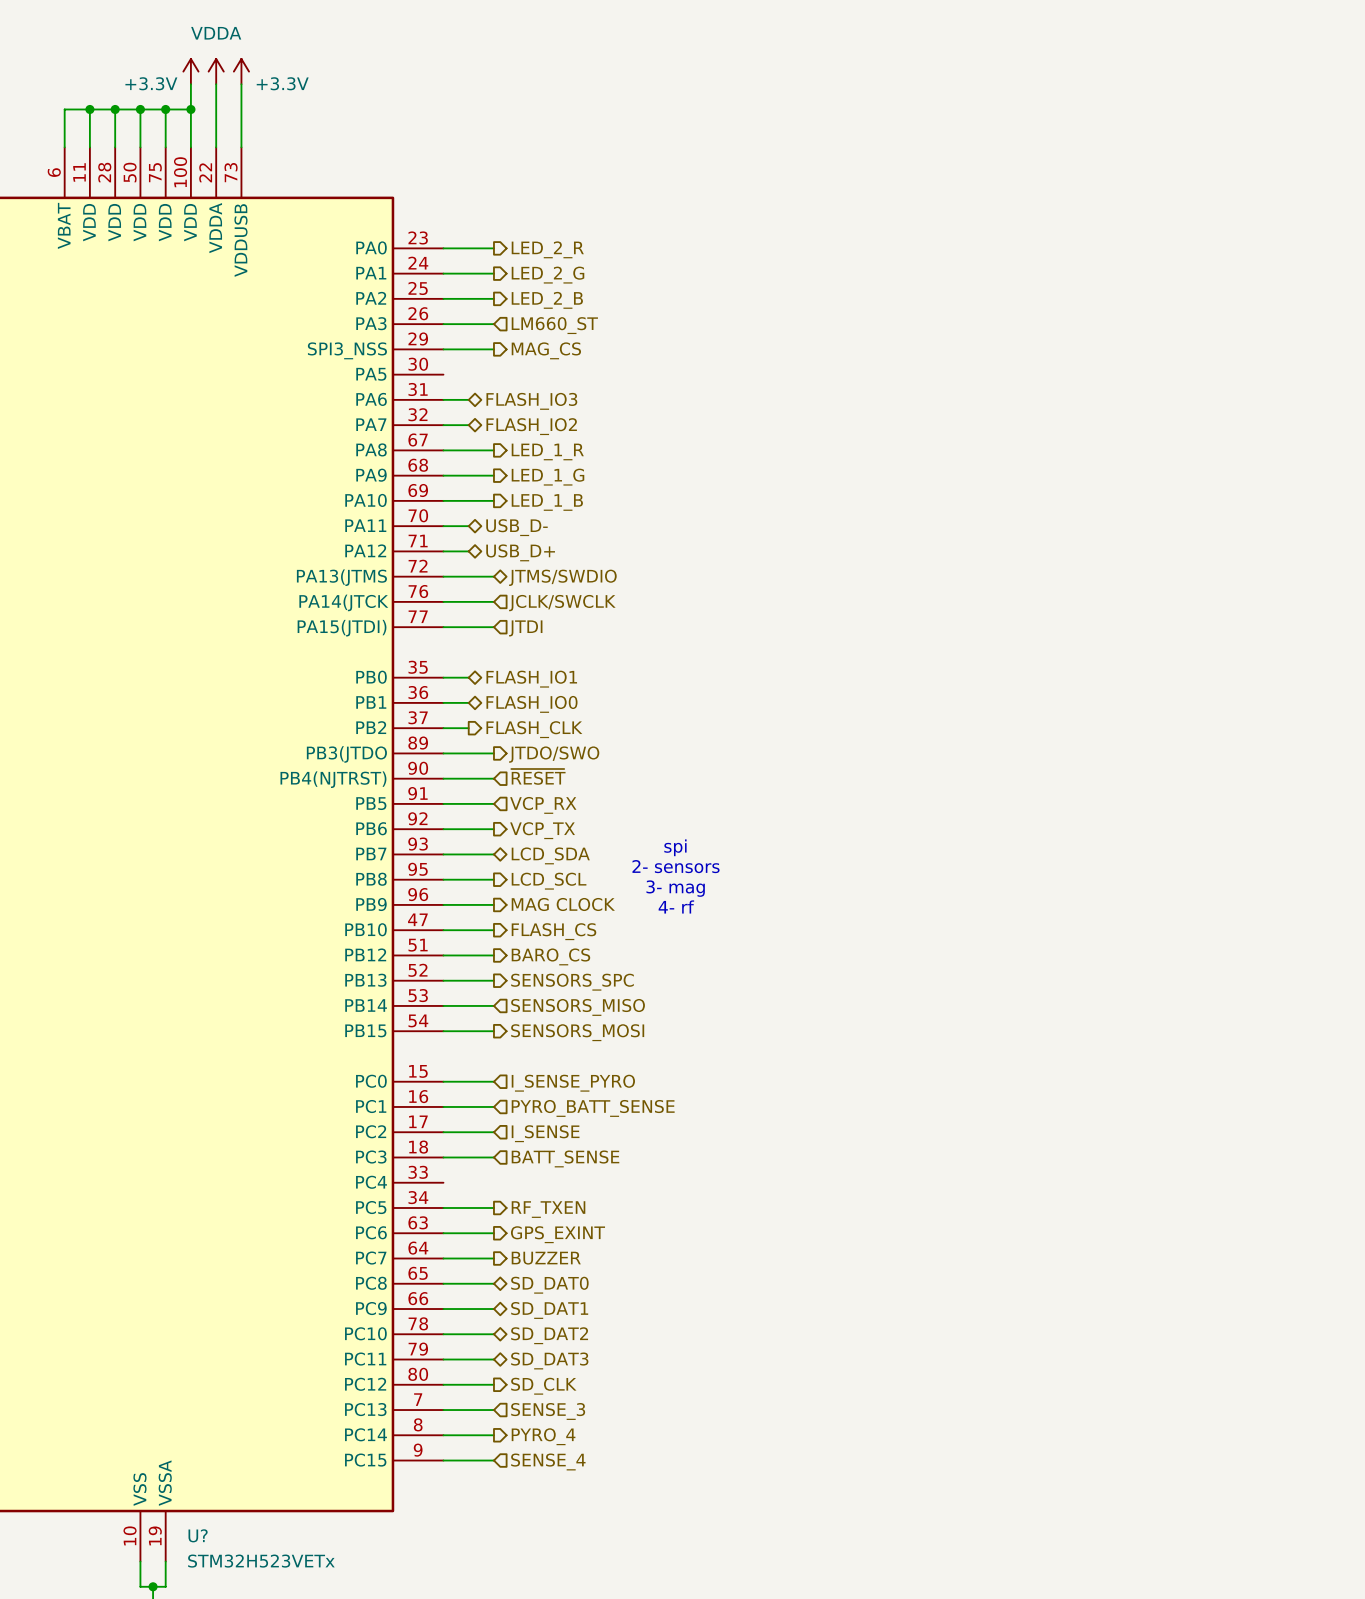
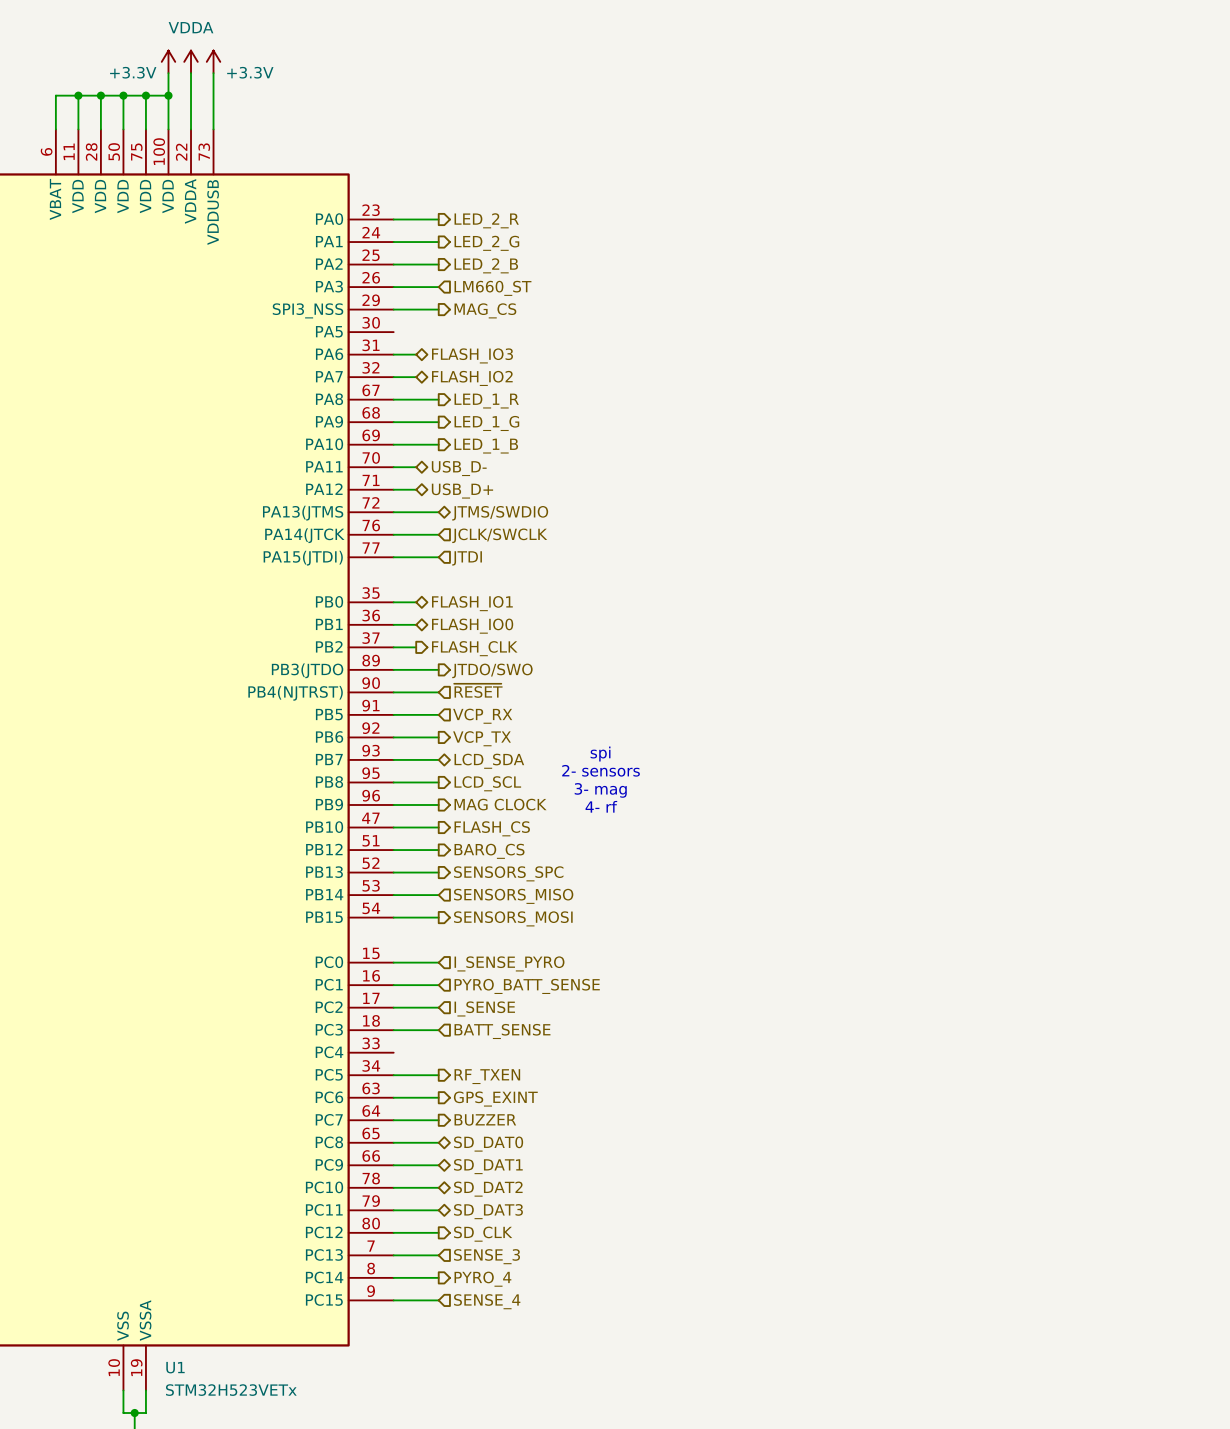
U? name: U? (198, 1535) -> U1 (175, 1367)

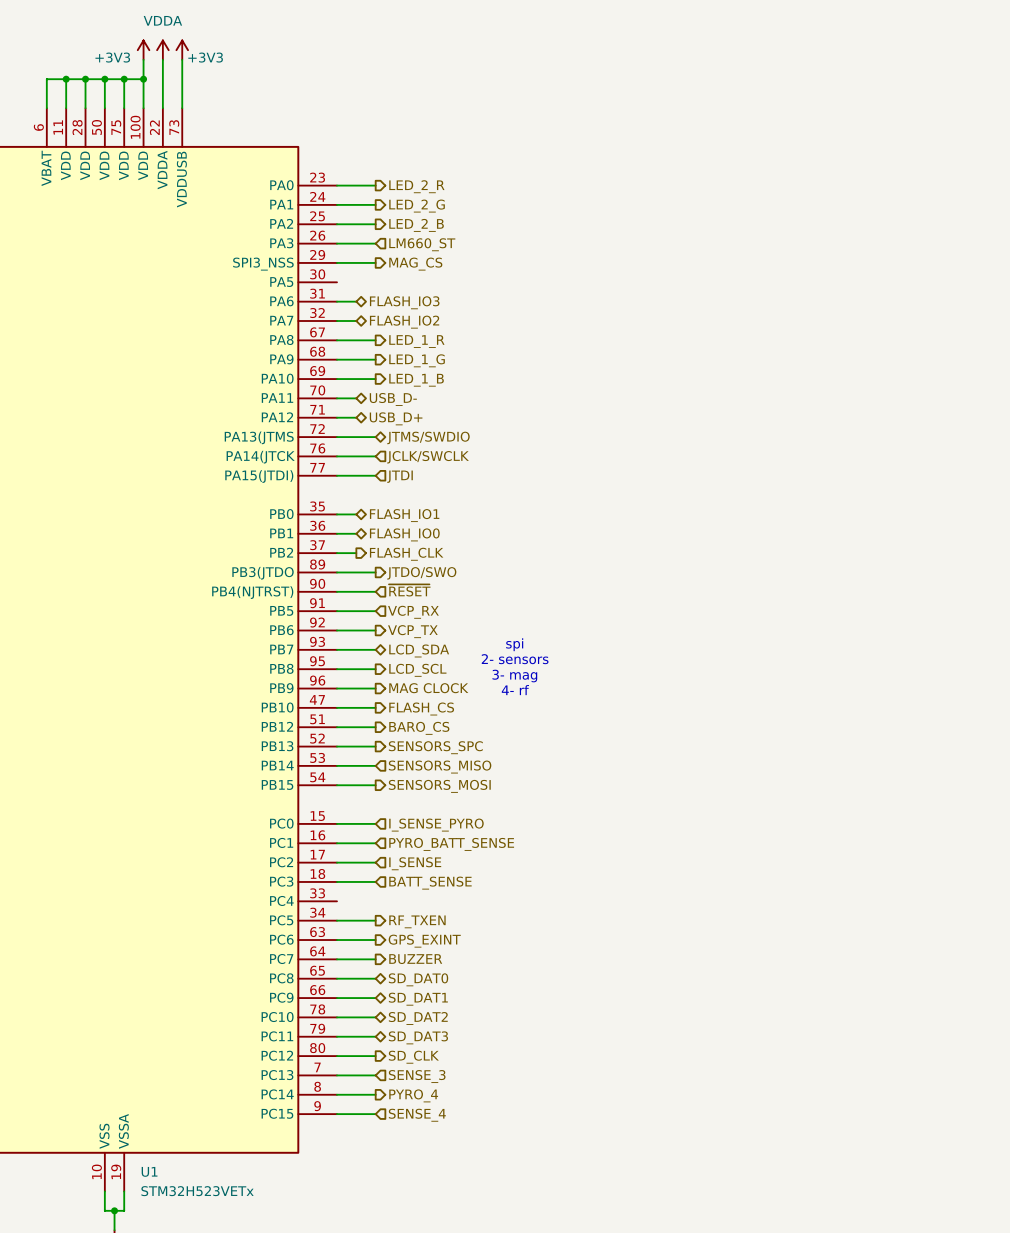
power symbol: +3.3V (168, 61) -> +3V3 (143, 50)
power symbol: +3.3V (213, 61) -> +3V3 (182, 50)

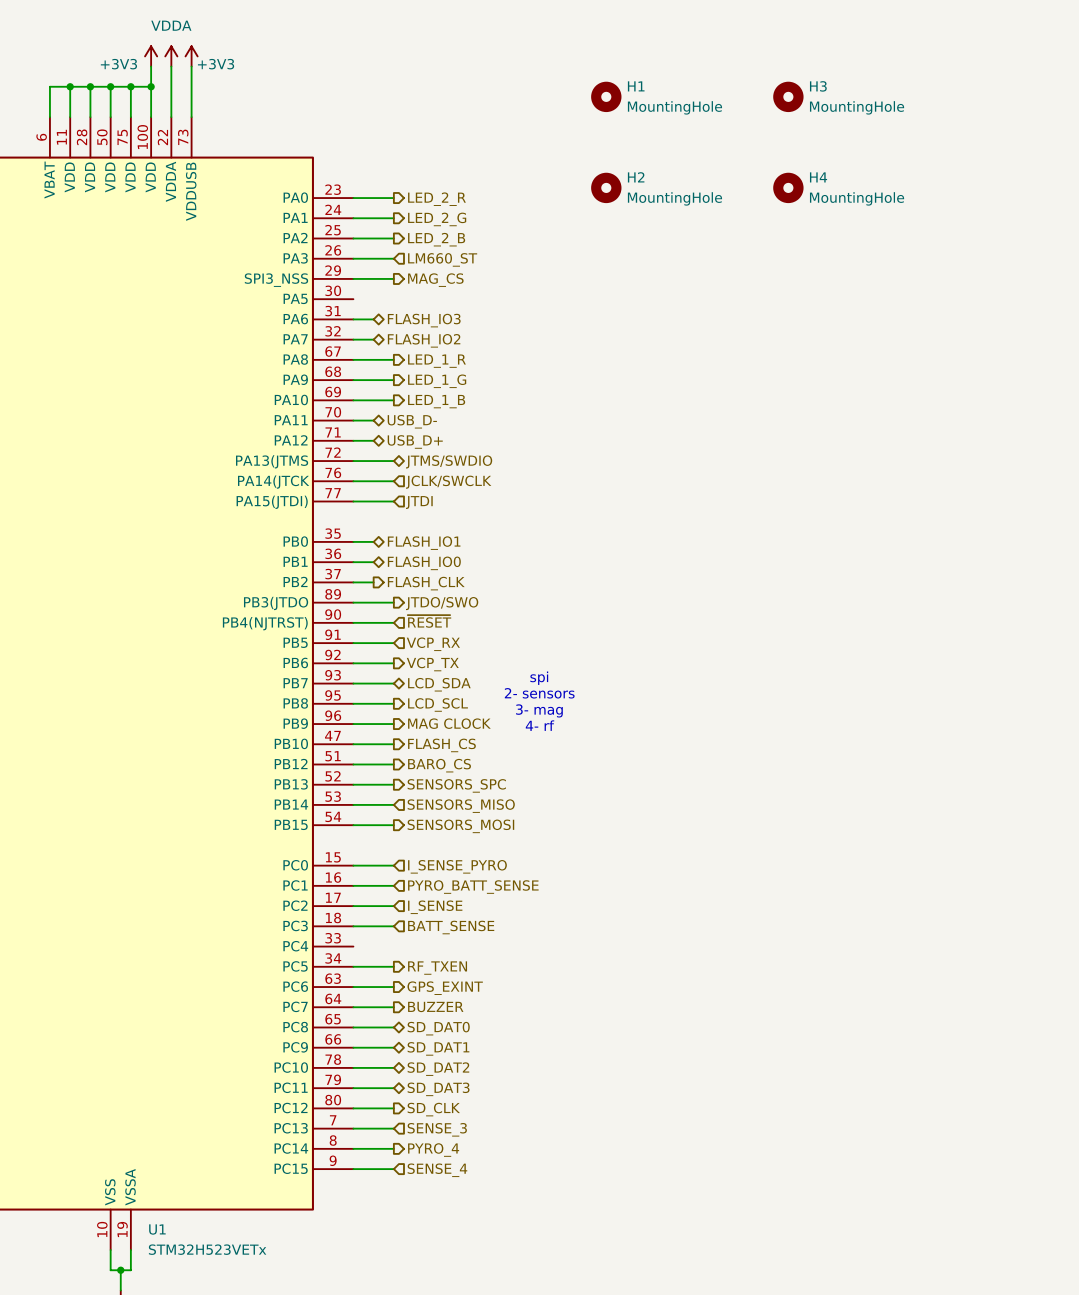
H1: none -> MountingHole (606, 96)
H3: none -> MountingHole (788, 96)
H2: none -> MountingHole (606, 187)
H4: none -> MountingHole (788, 187)

